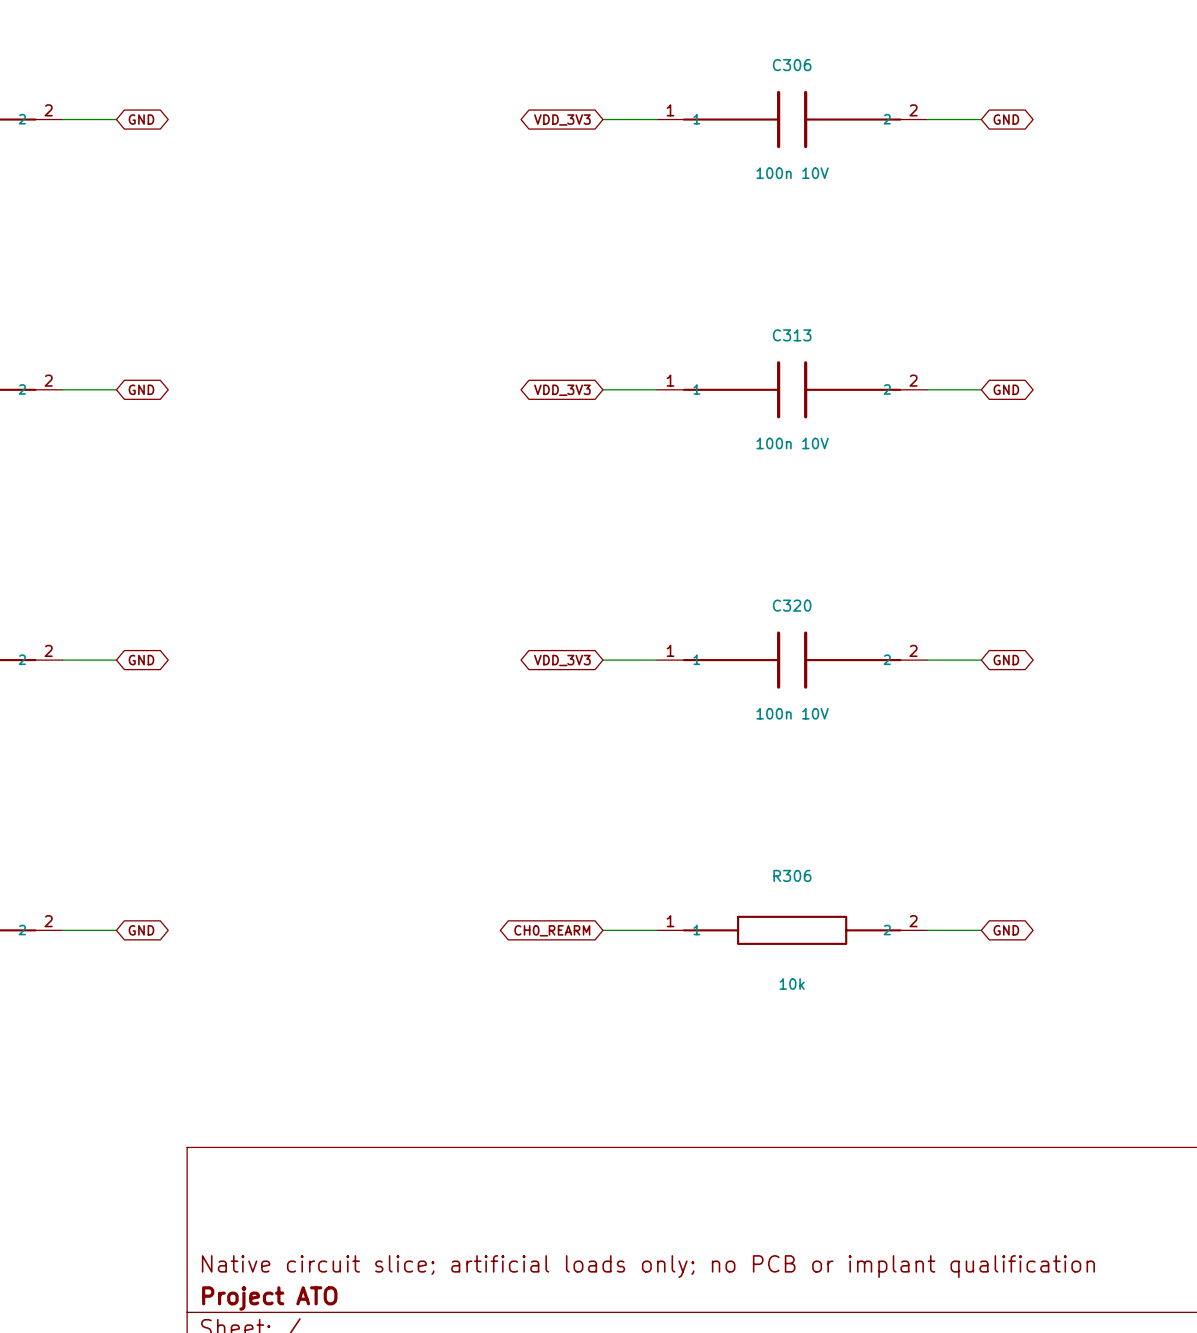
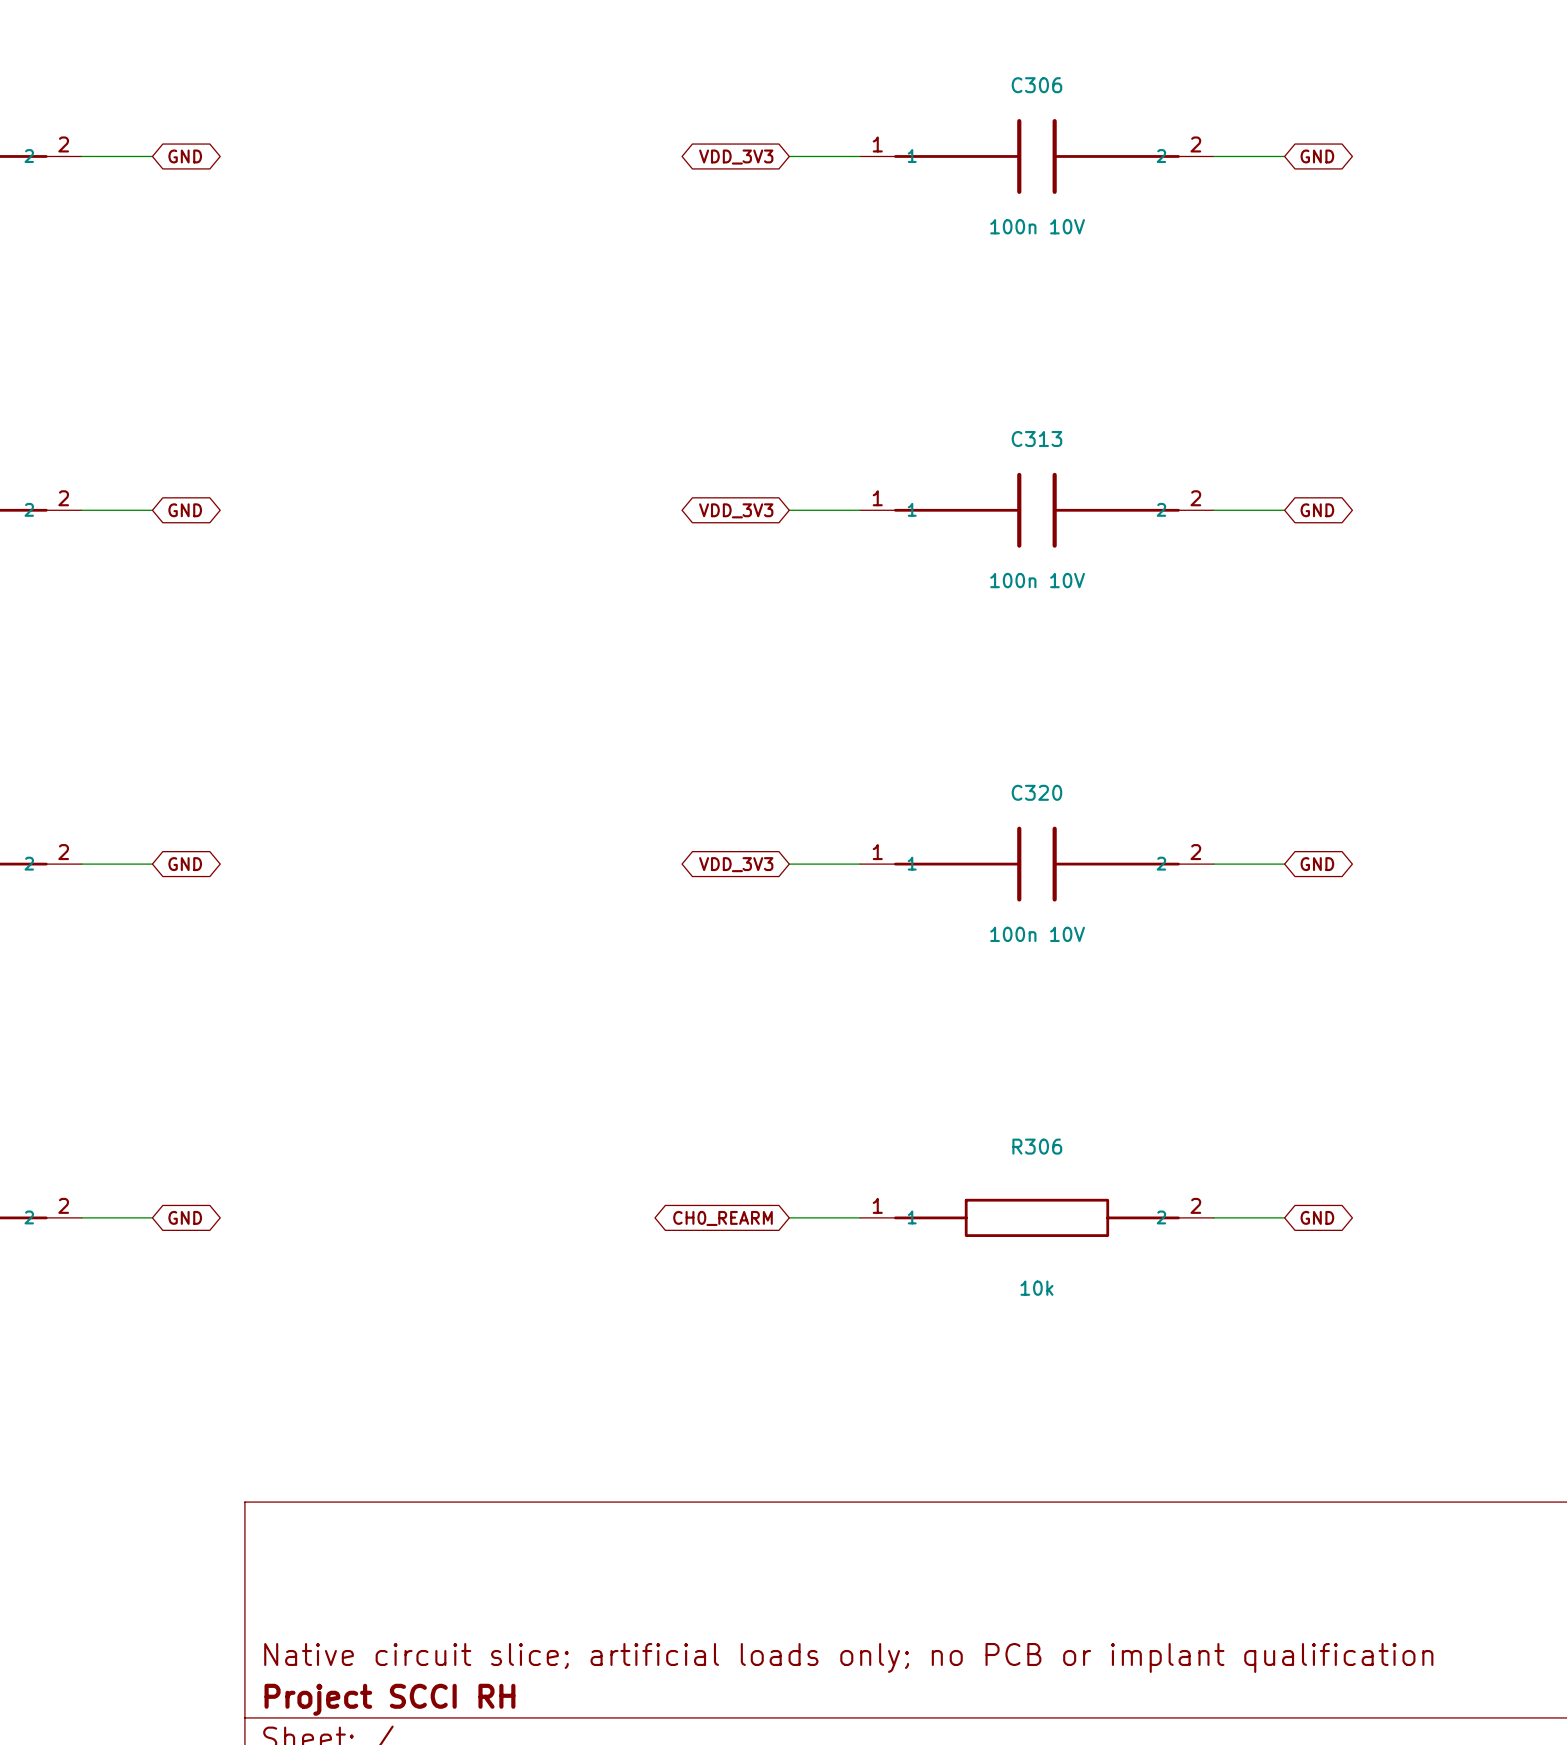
title block: Project ATO (269, 1298) -> Project SCCI RH (389, 1699)

